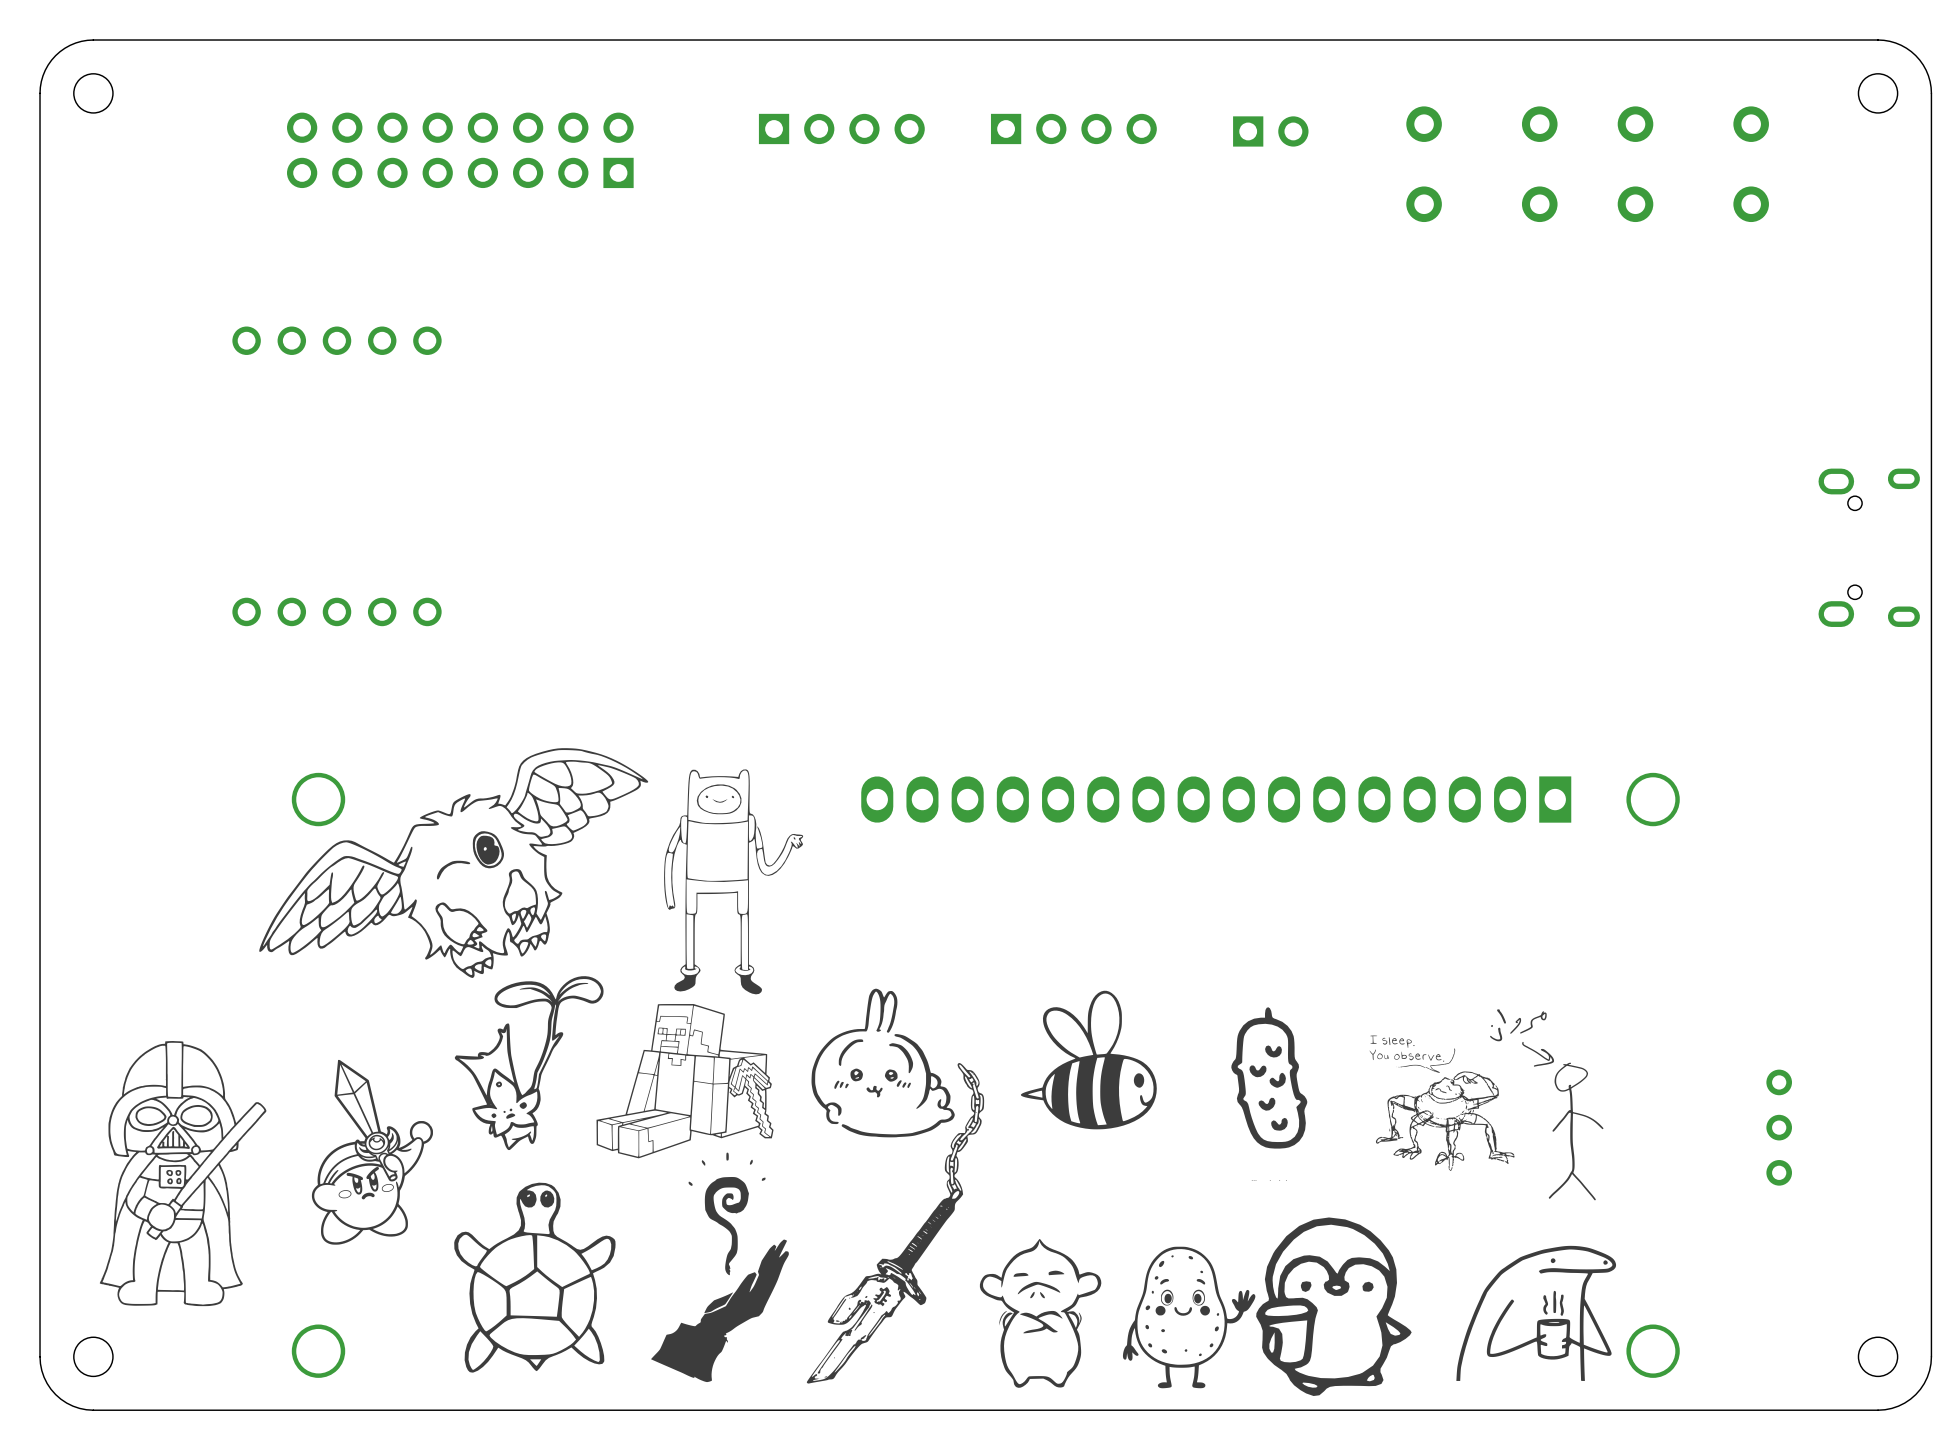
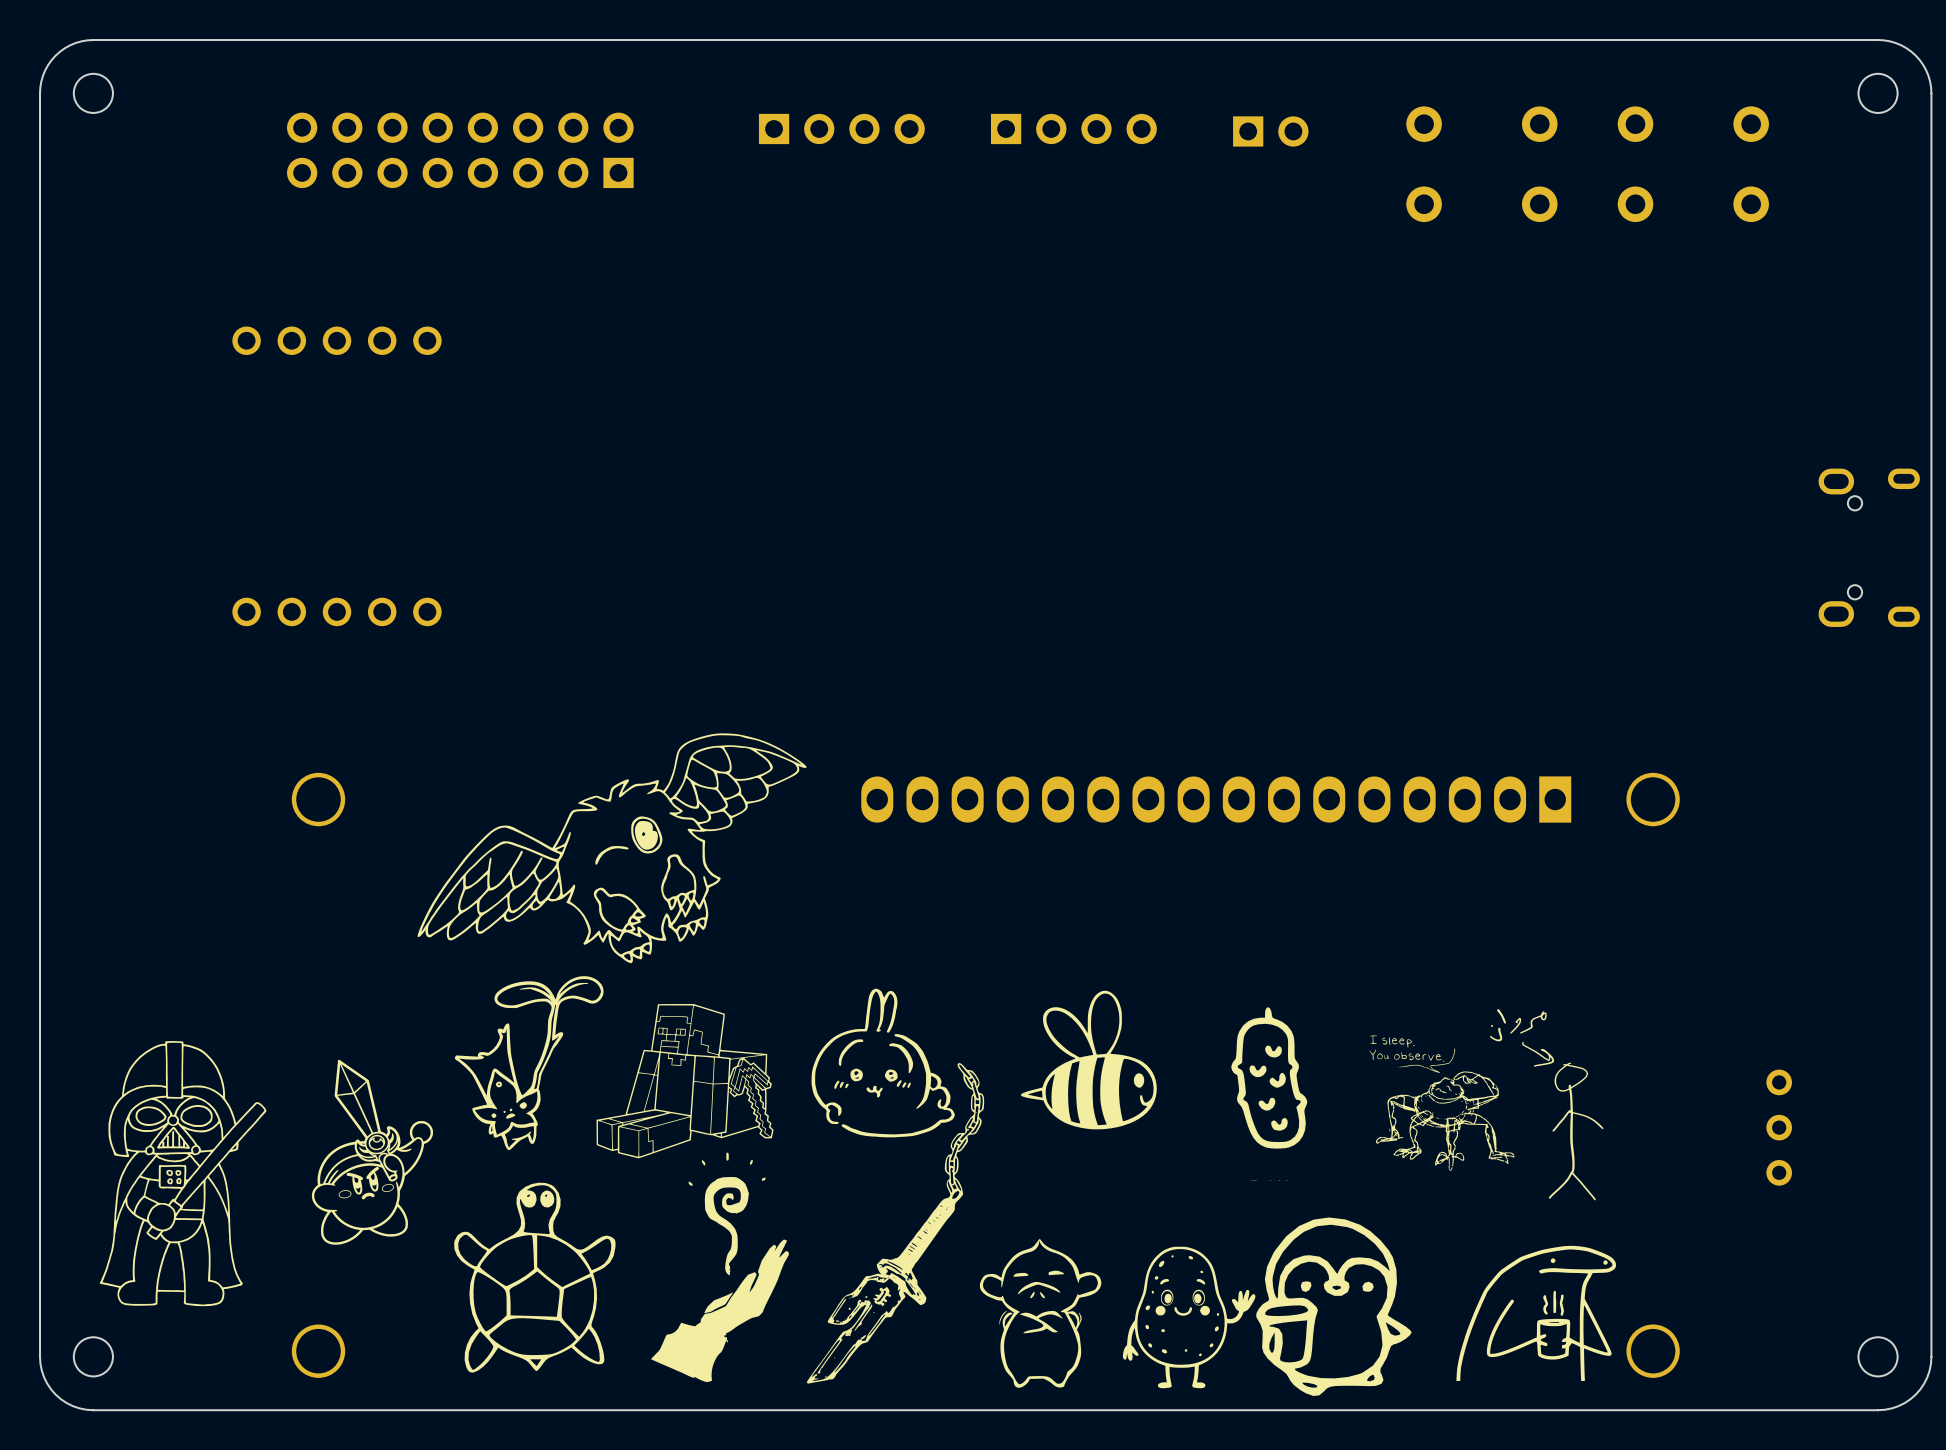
drawing: [664, 769, 804, 995] -> none
drawing position: (453, 863) -> (612, 848)

